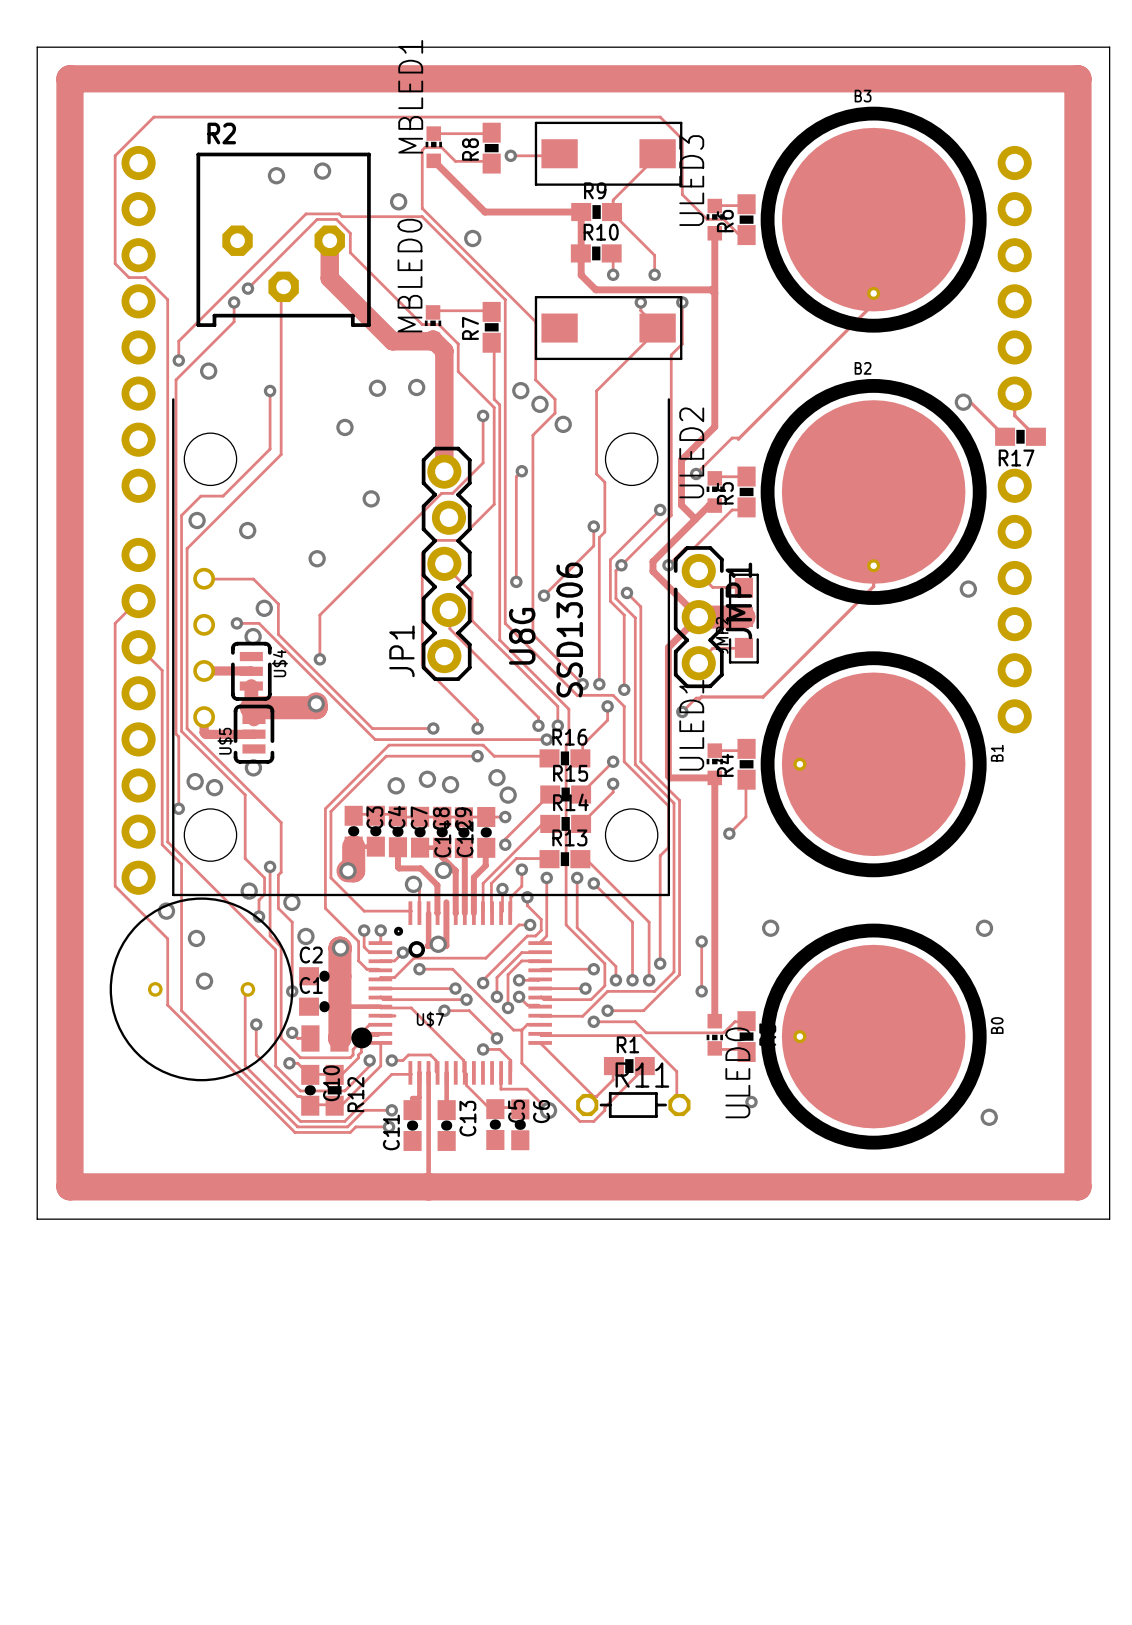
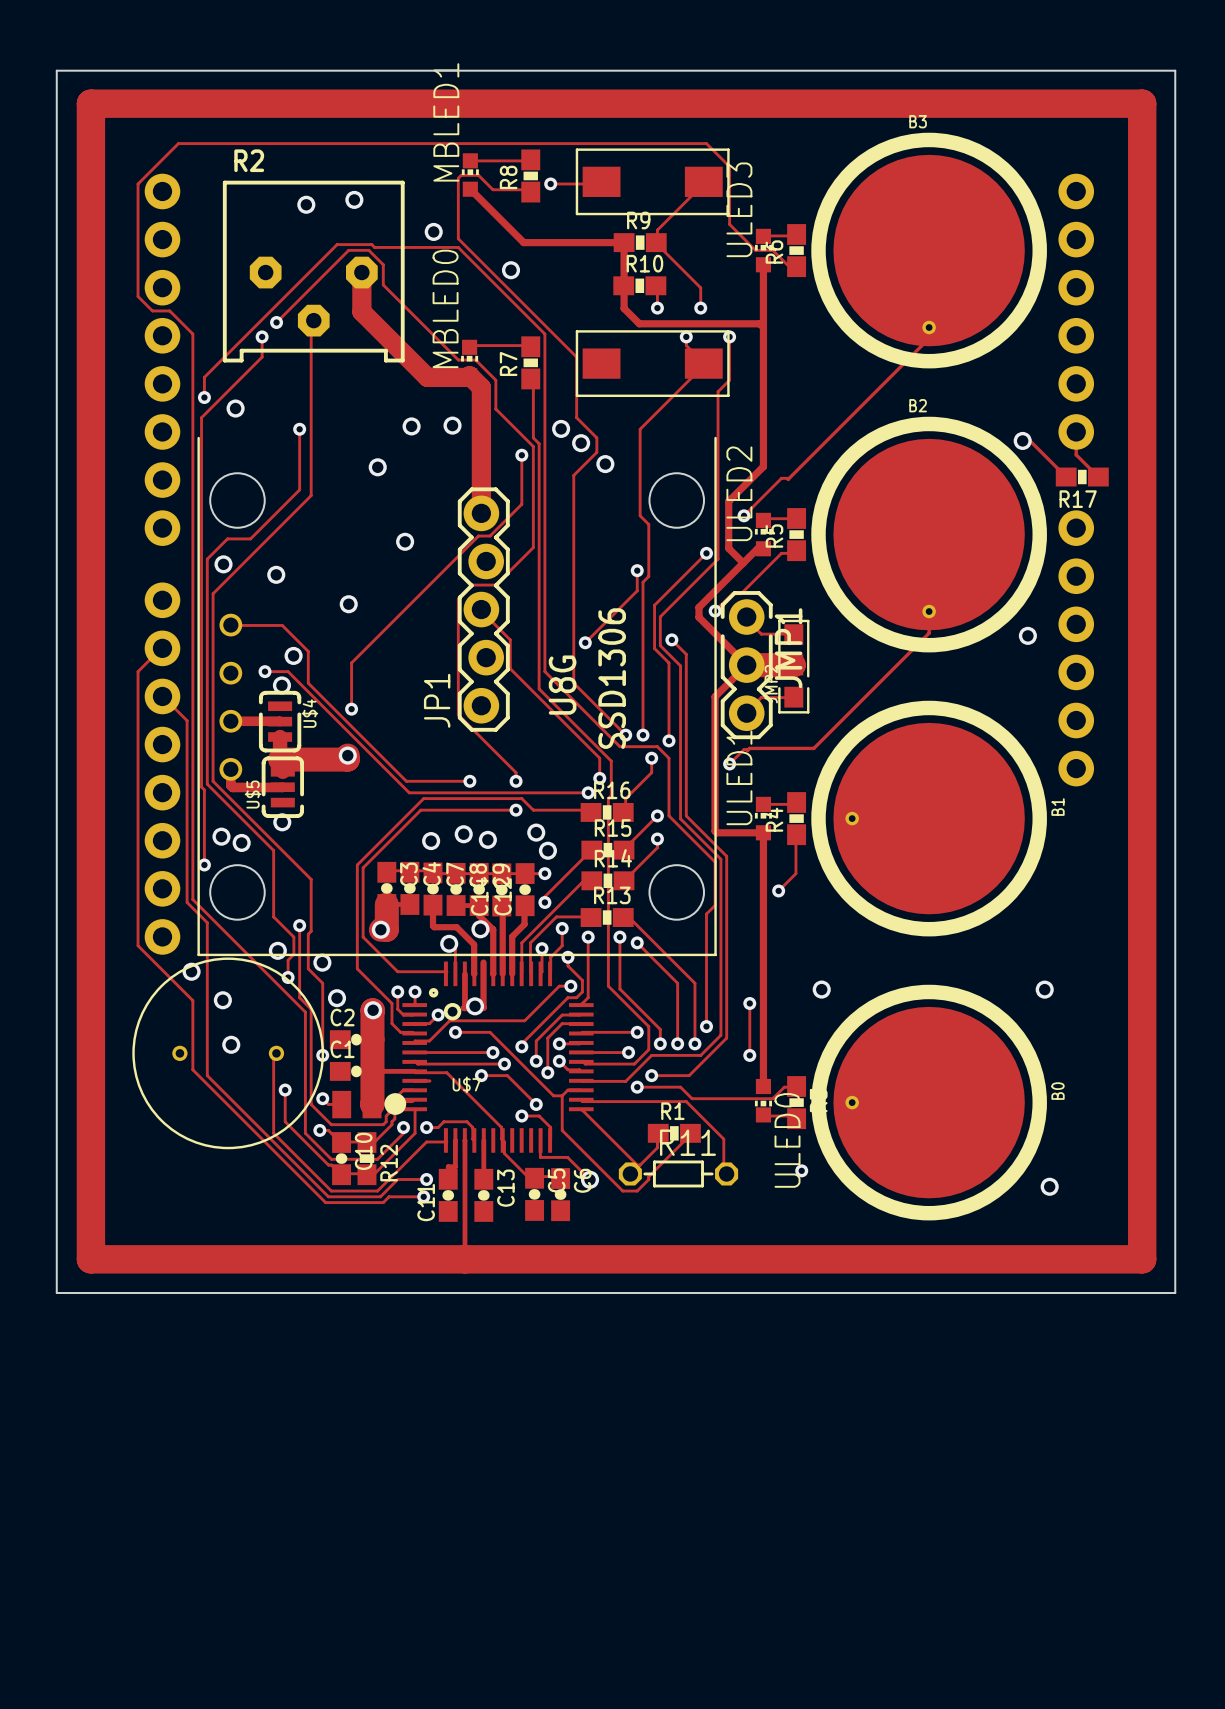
track: (521, 471) (516, 476) (516, 581) -> none
via: (521, 471) -> none
via: (621, 565) -> none
via: (516, 581) -> none
track: (448, 609) (449, 628) (538, 717) (538, 725) -> none
via: (538, 725) -> none

